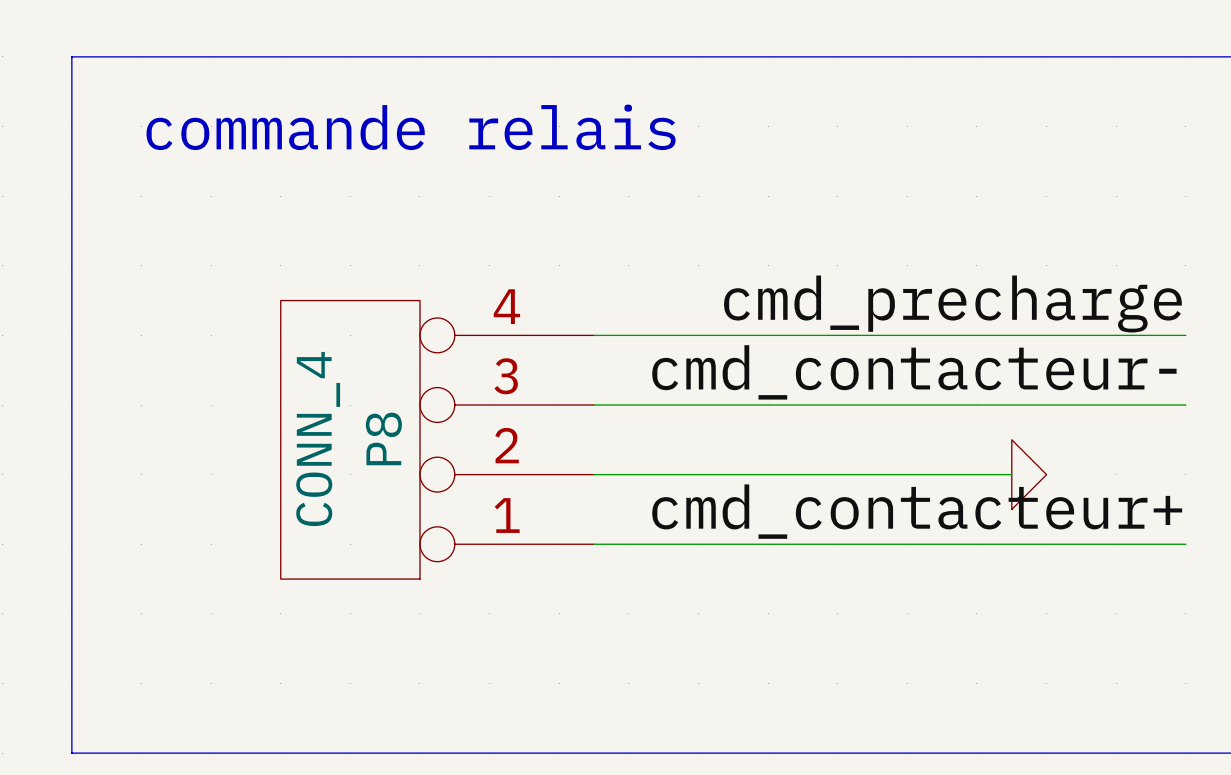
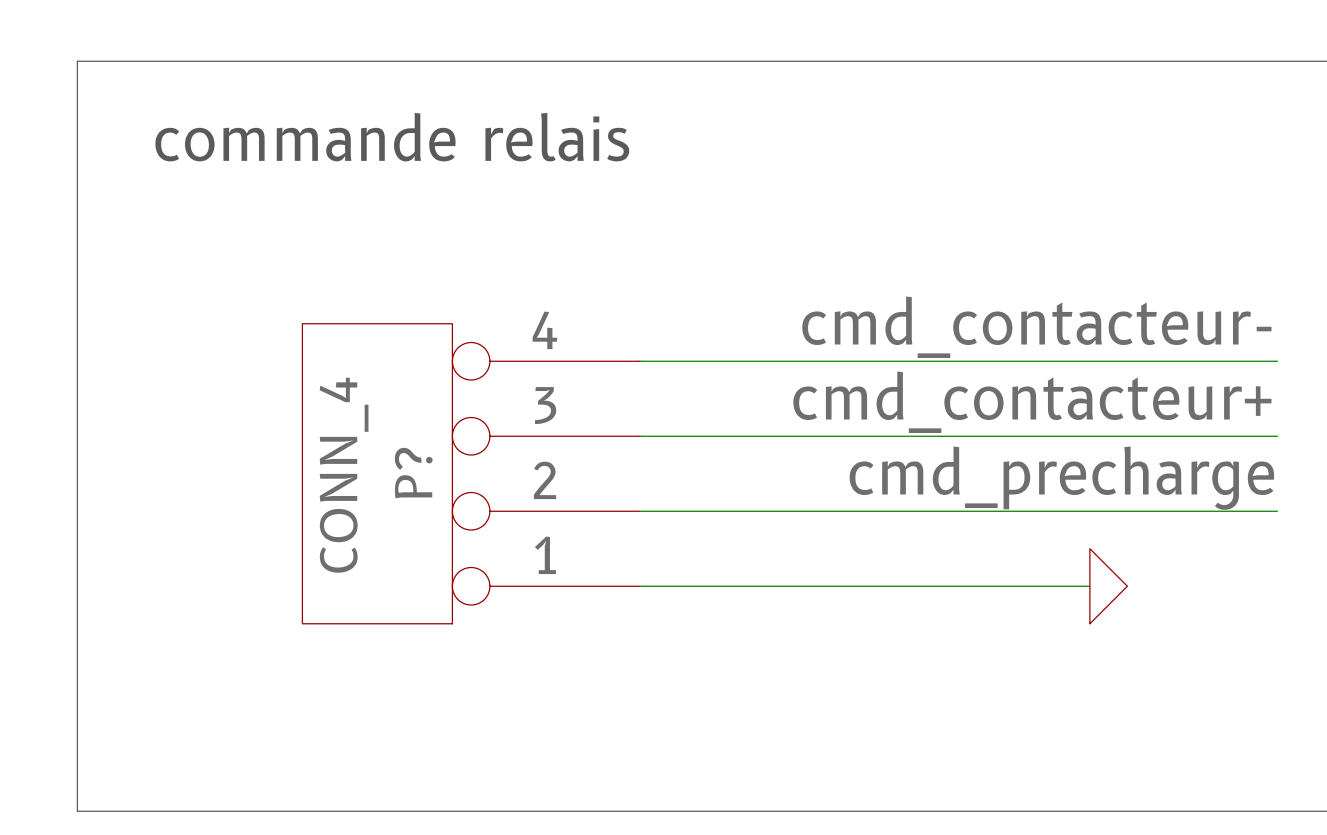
label: cmd_precharge (952, 304) -> cmd_contacteur- (1036, 327)
label: cmd_contacteur- (914, 372) -> cmd_contacteur+ (1032, 402)
P8 name: P8 (383, 438) -> P? (413, 473)
label: none -> cmd_precharge (1061, 478)
power symbol position: (1029, 474) -> (1108, 586)
label: cmd_contacteur+ (917, 511) -> none
wire: (1011, 544) (1185, 544) -> (1089, 511) (1277, 511)

